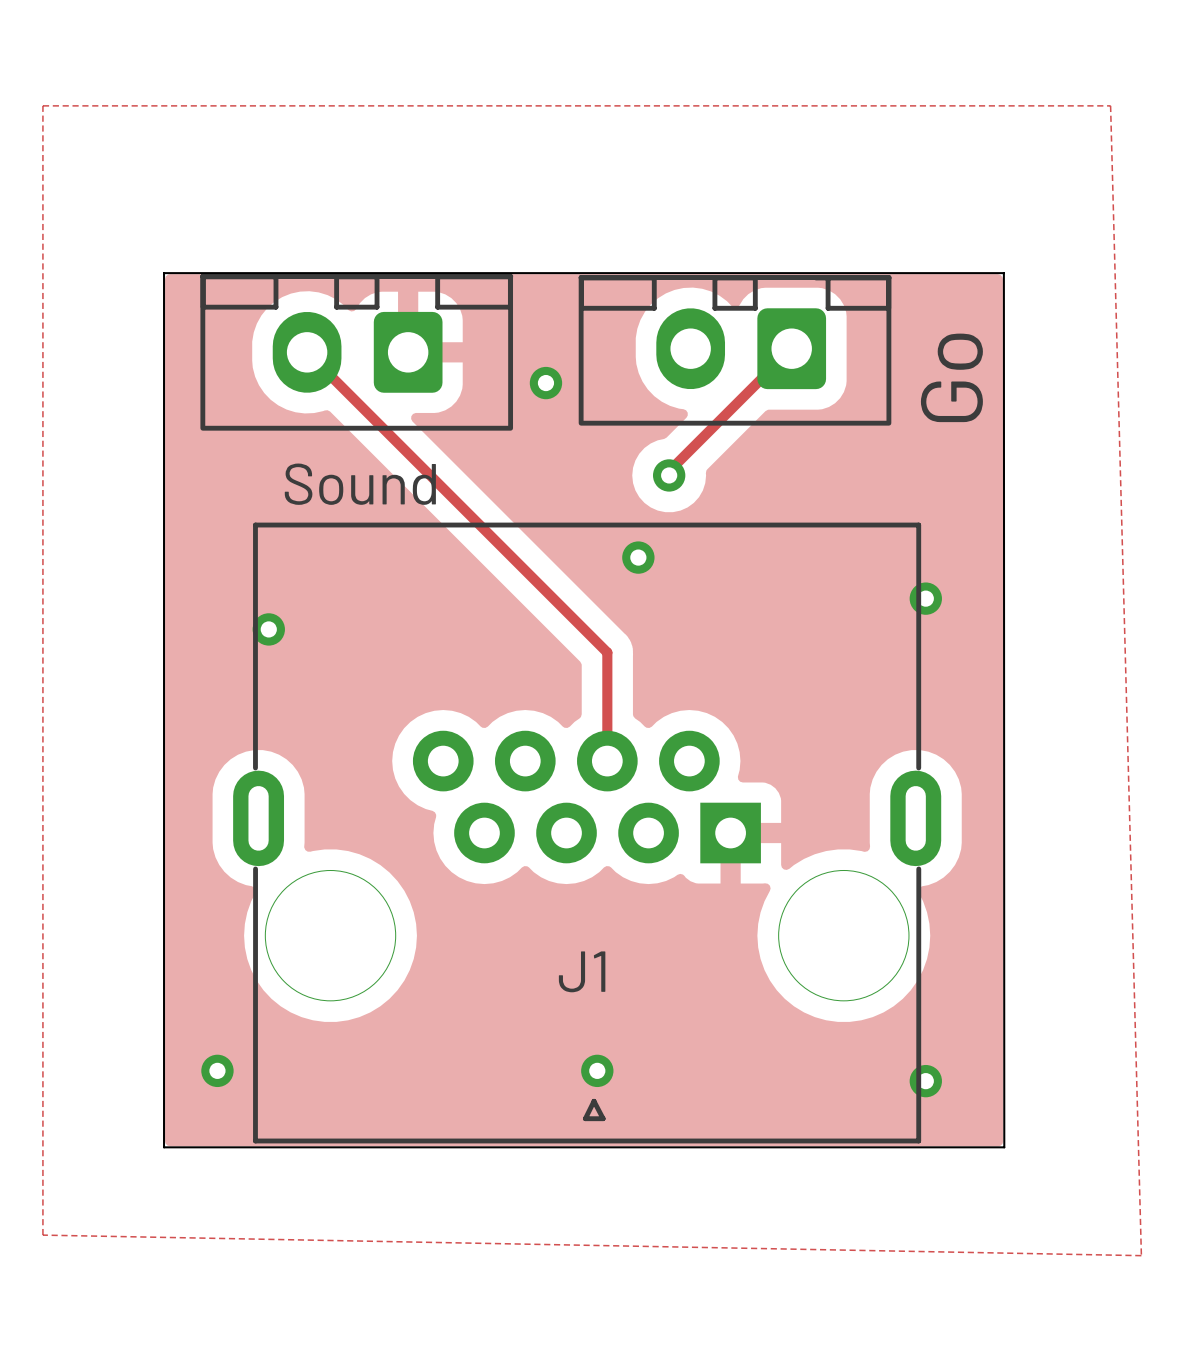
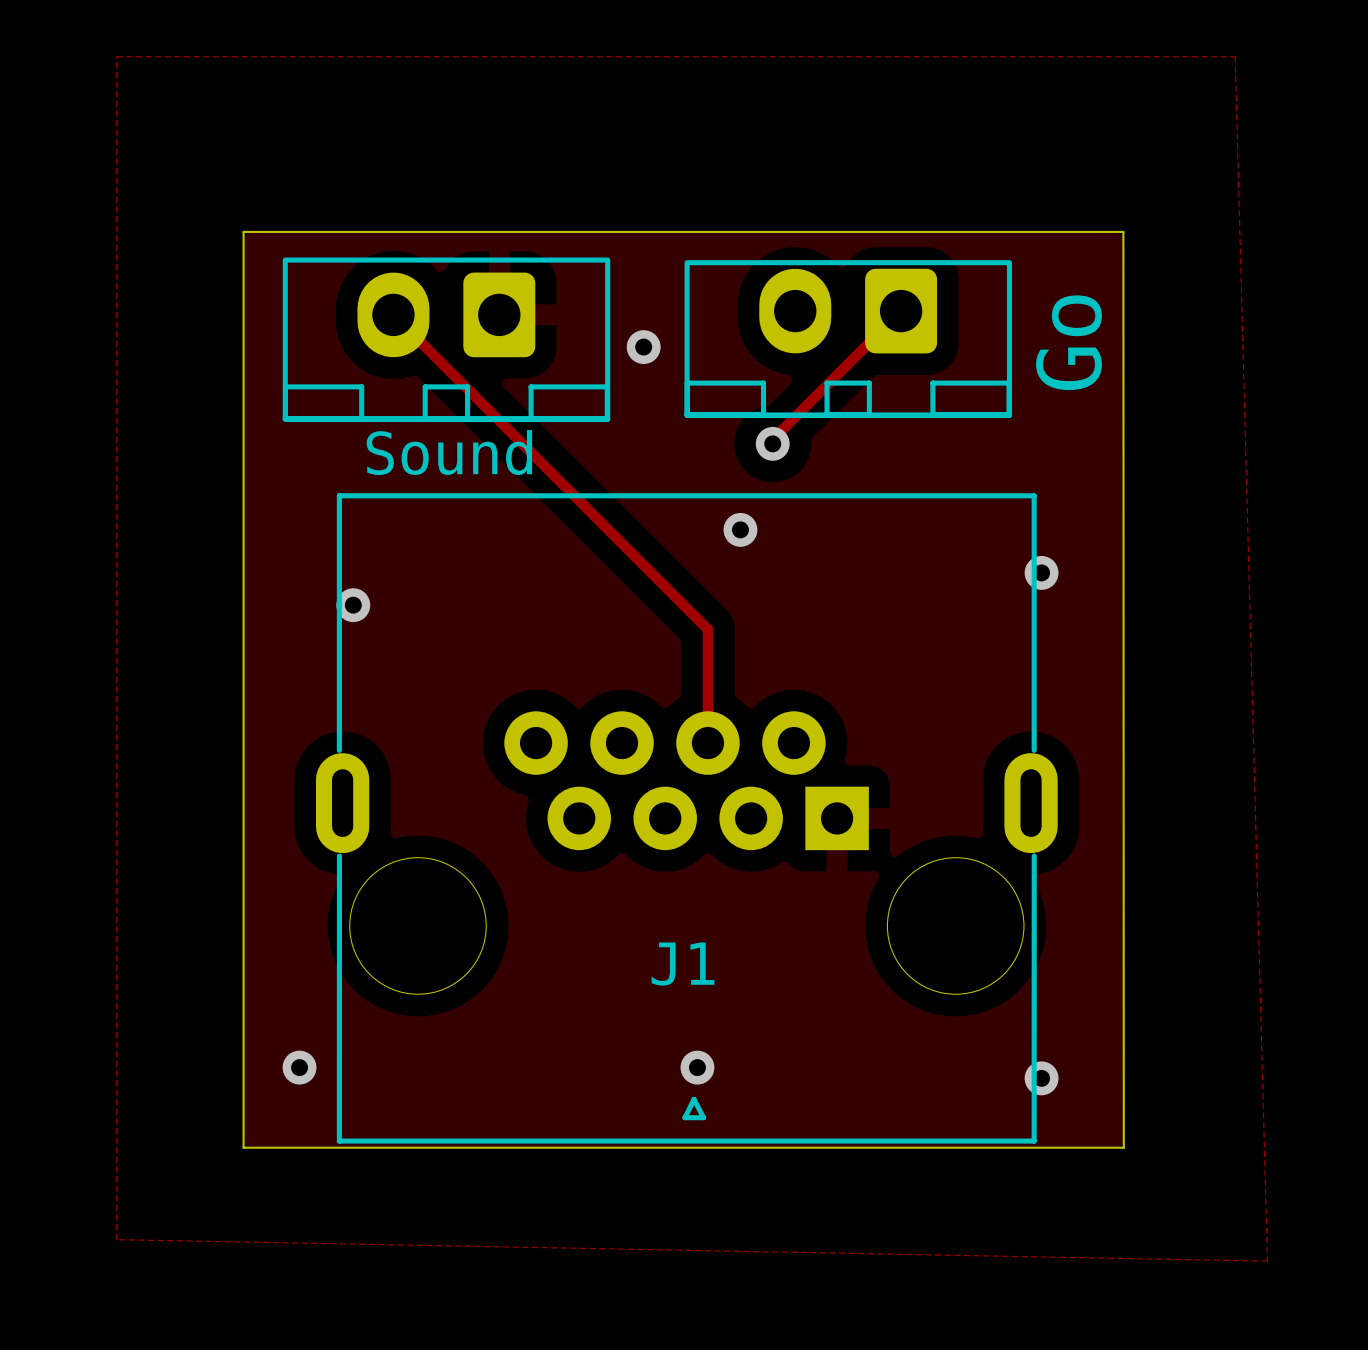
part footprint: [200, 274, 514, 431] -> [282, 257, 611, 422]
part footprint: [578, 275, 892, 426] -> [684, 260, 1013, 418]

